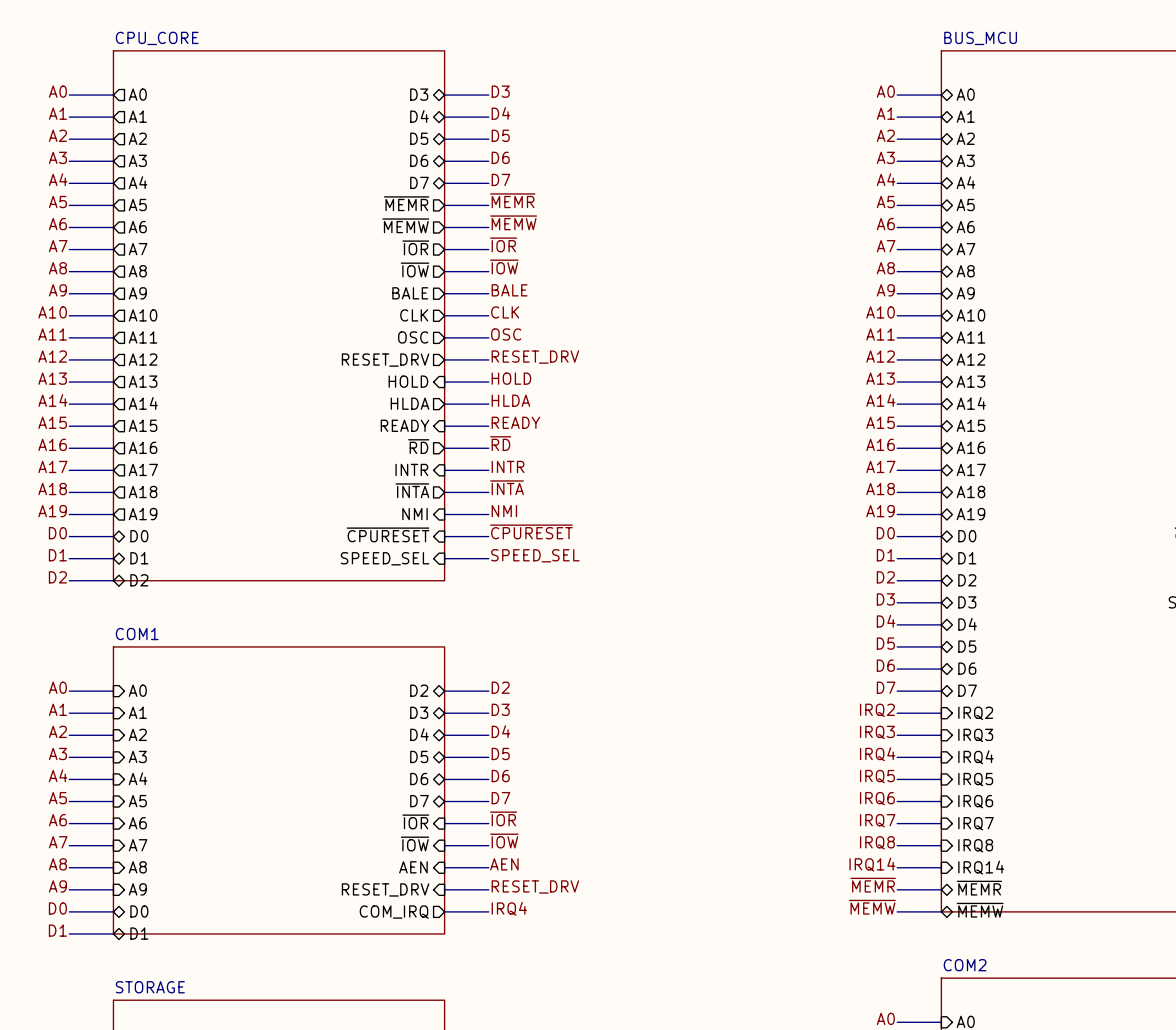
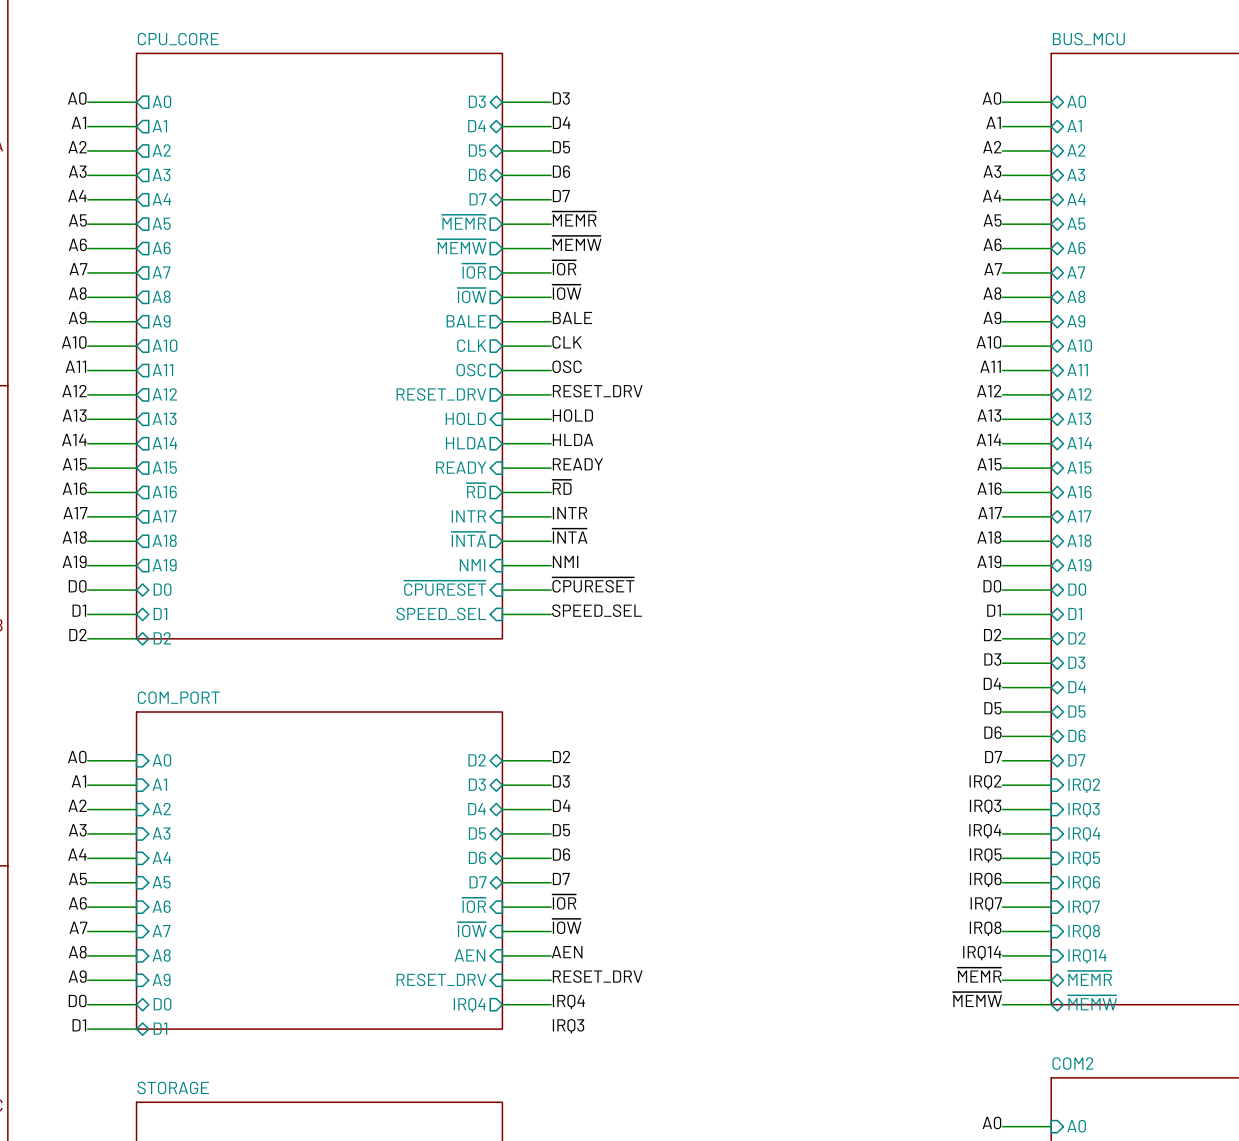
sheet COM1 name: COM1 (137, 634) -> COM_PORT (178, 697)
sheet pin: COM_IRQ (394, 912) -> IRQ4 (469, 1005)
label: none -> IRQ3 (568, 1026)

